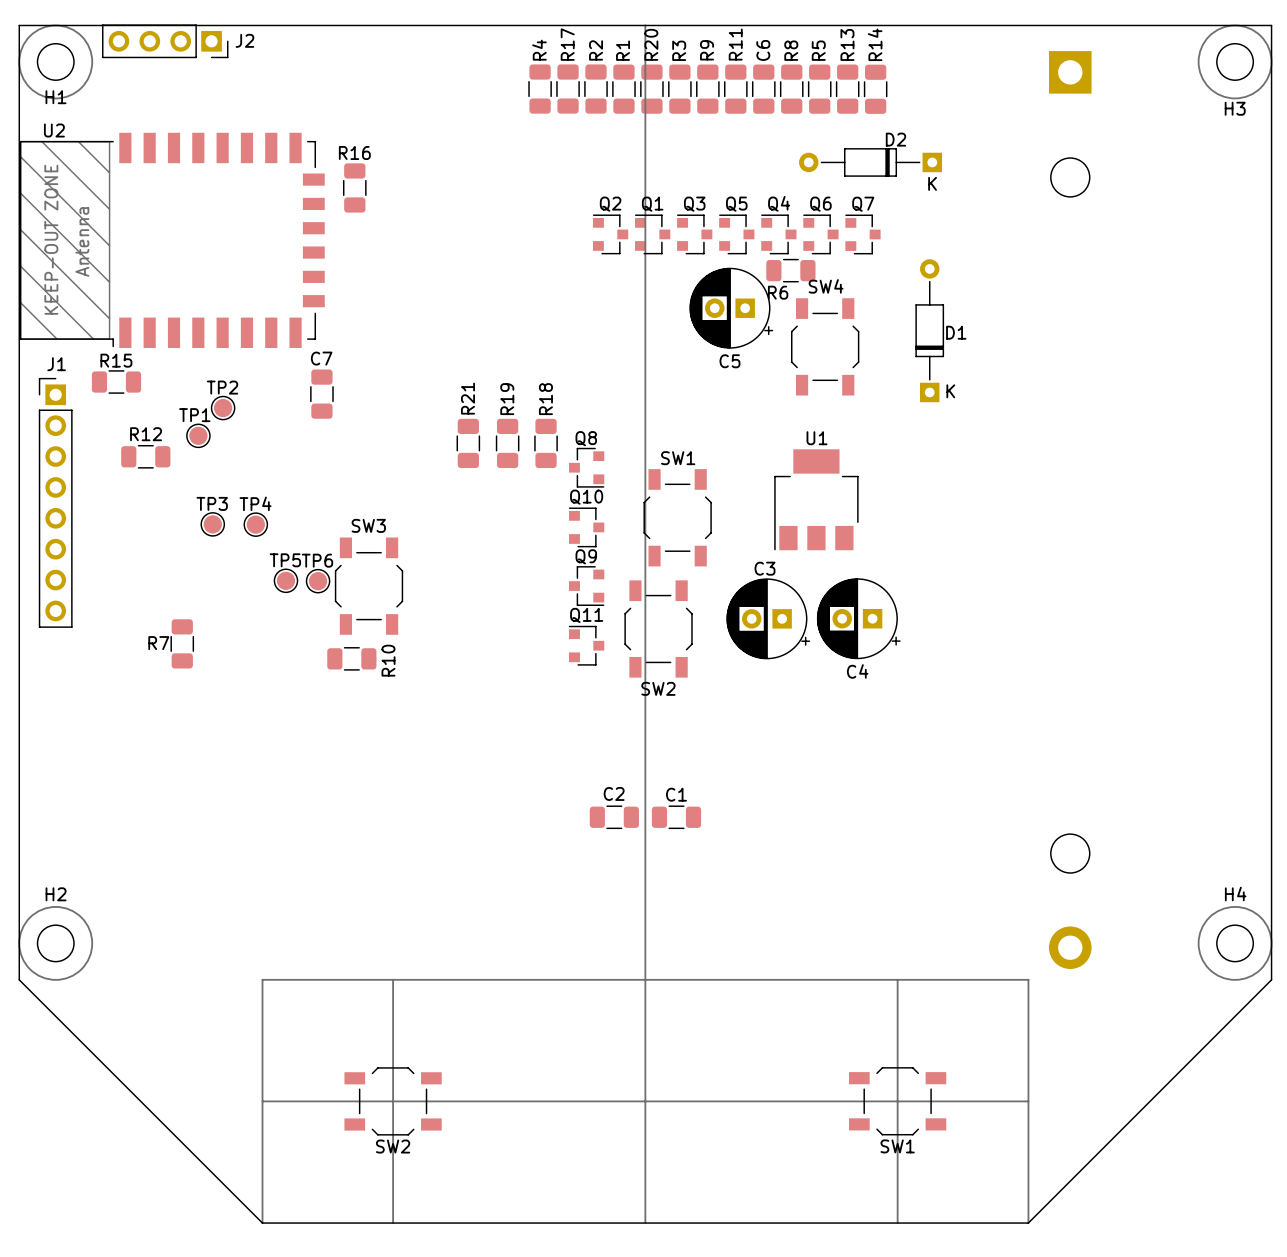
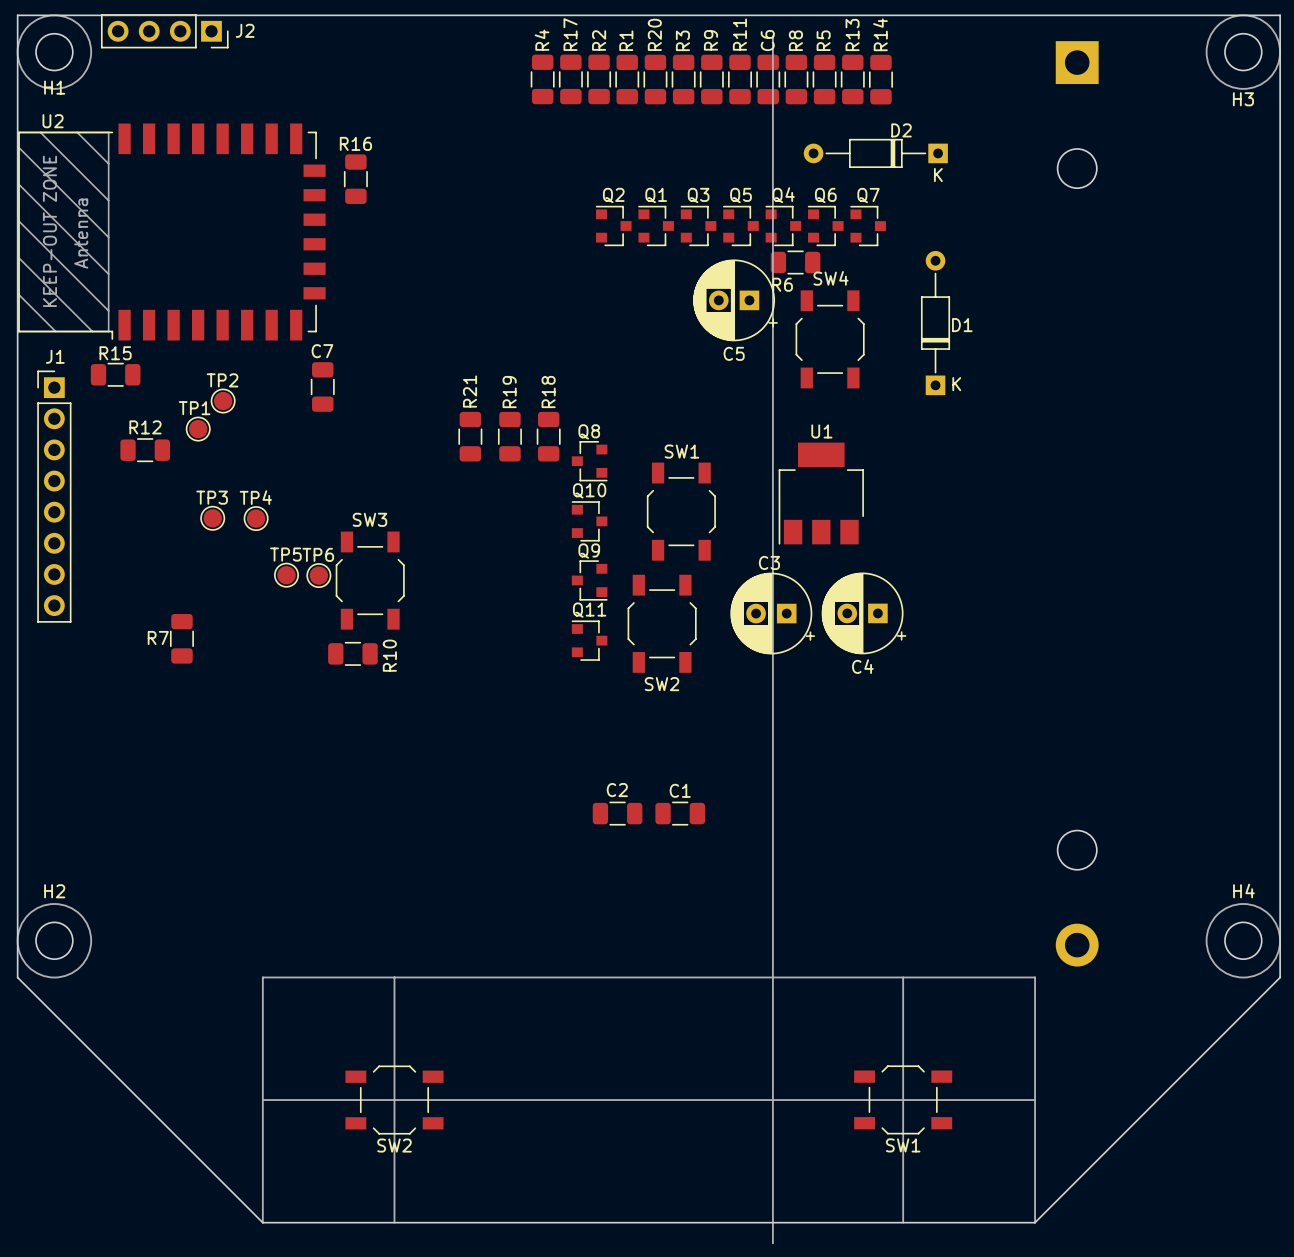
line: (645, 25) (645, 1222) -> (772, 36) (772, 1243)

